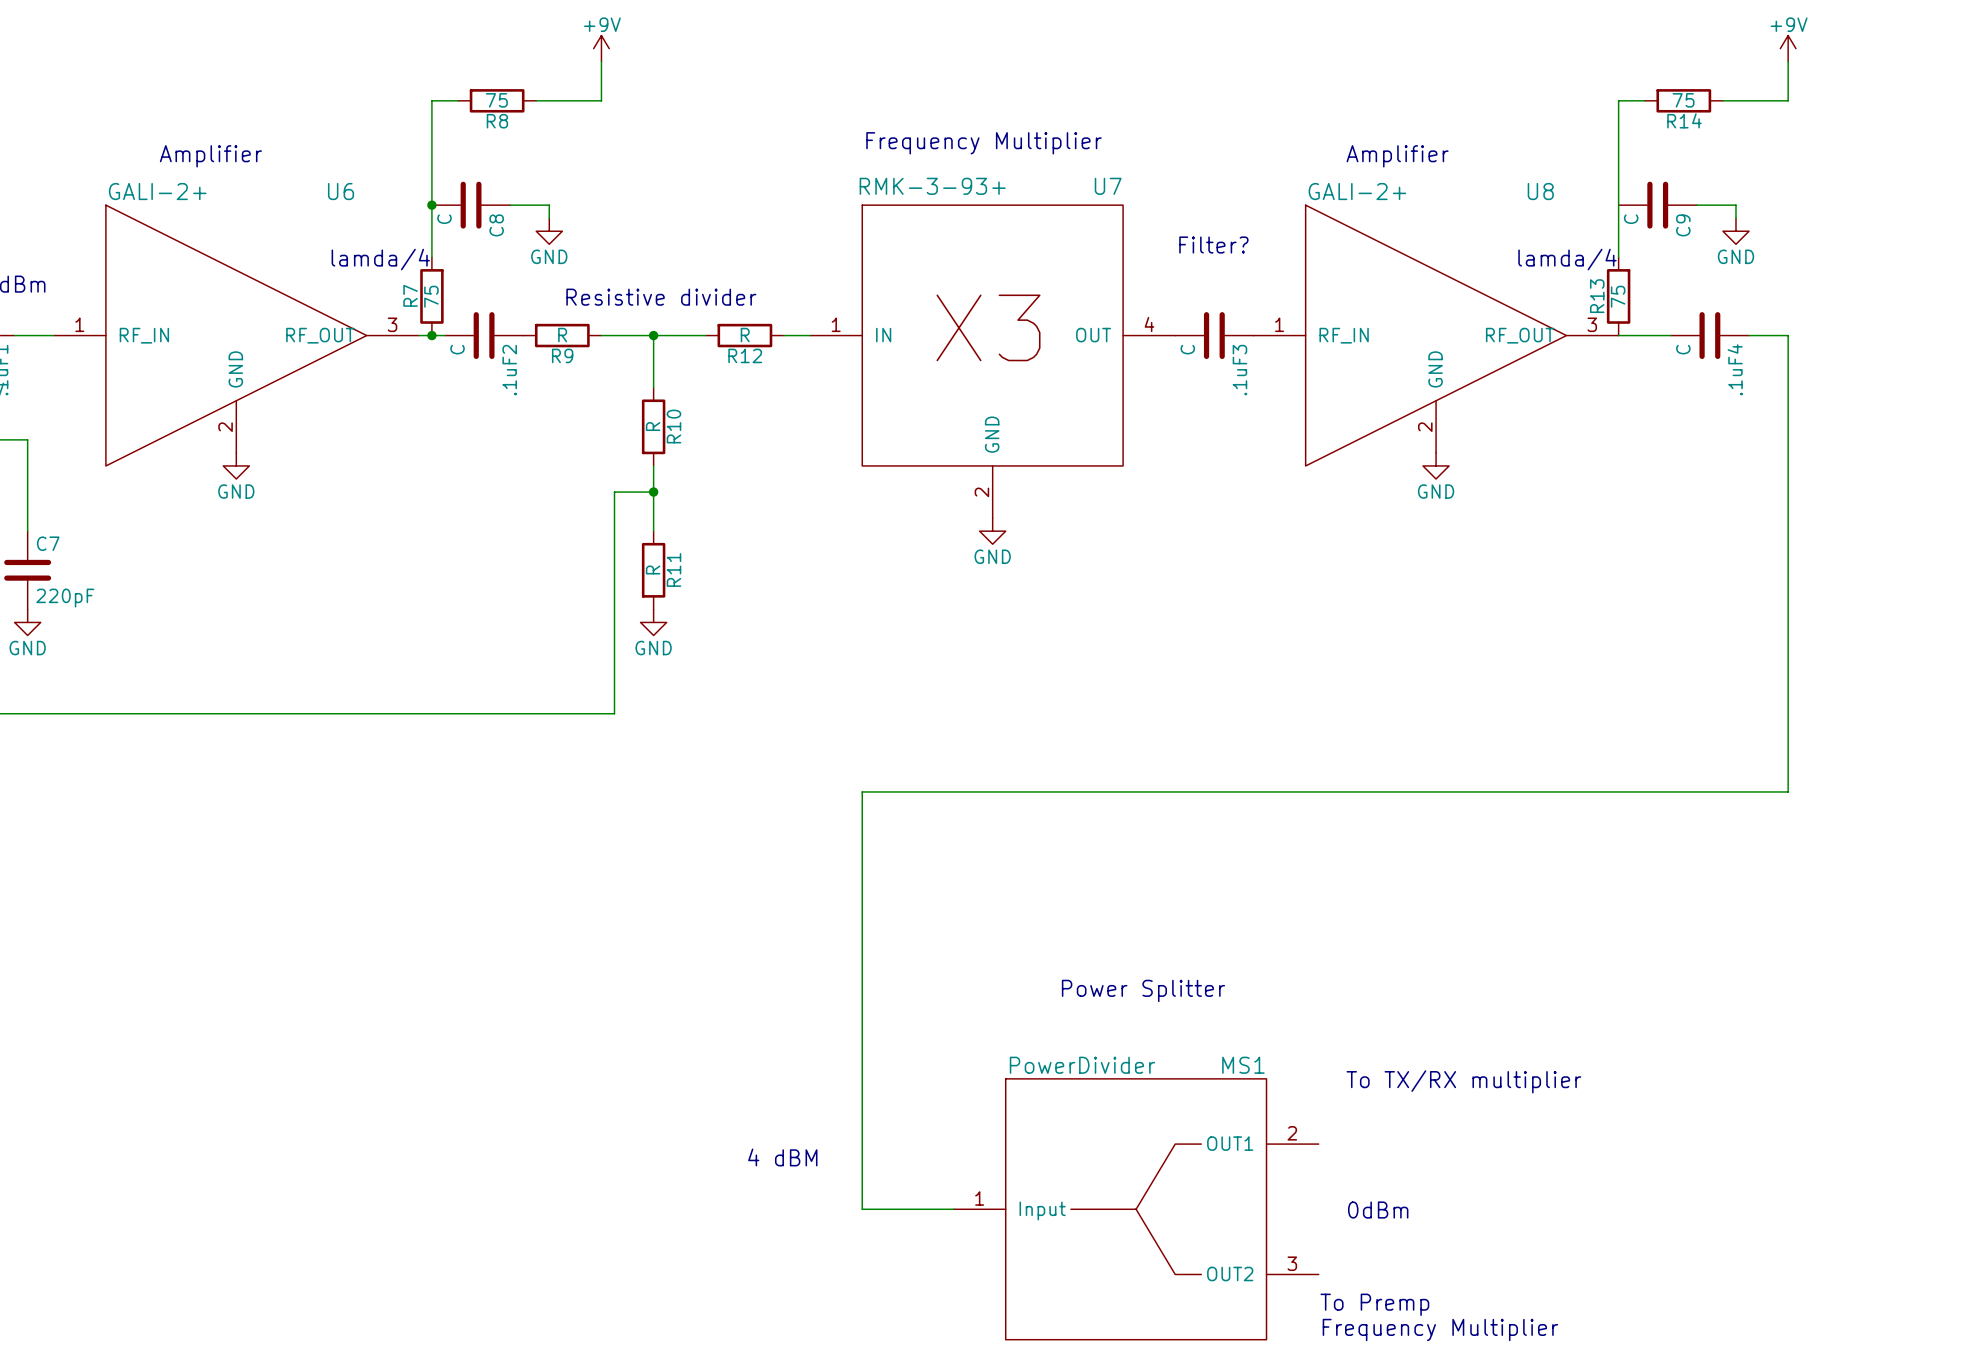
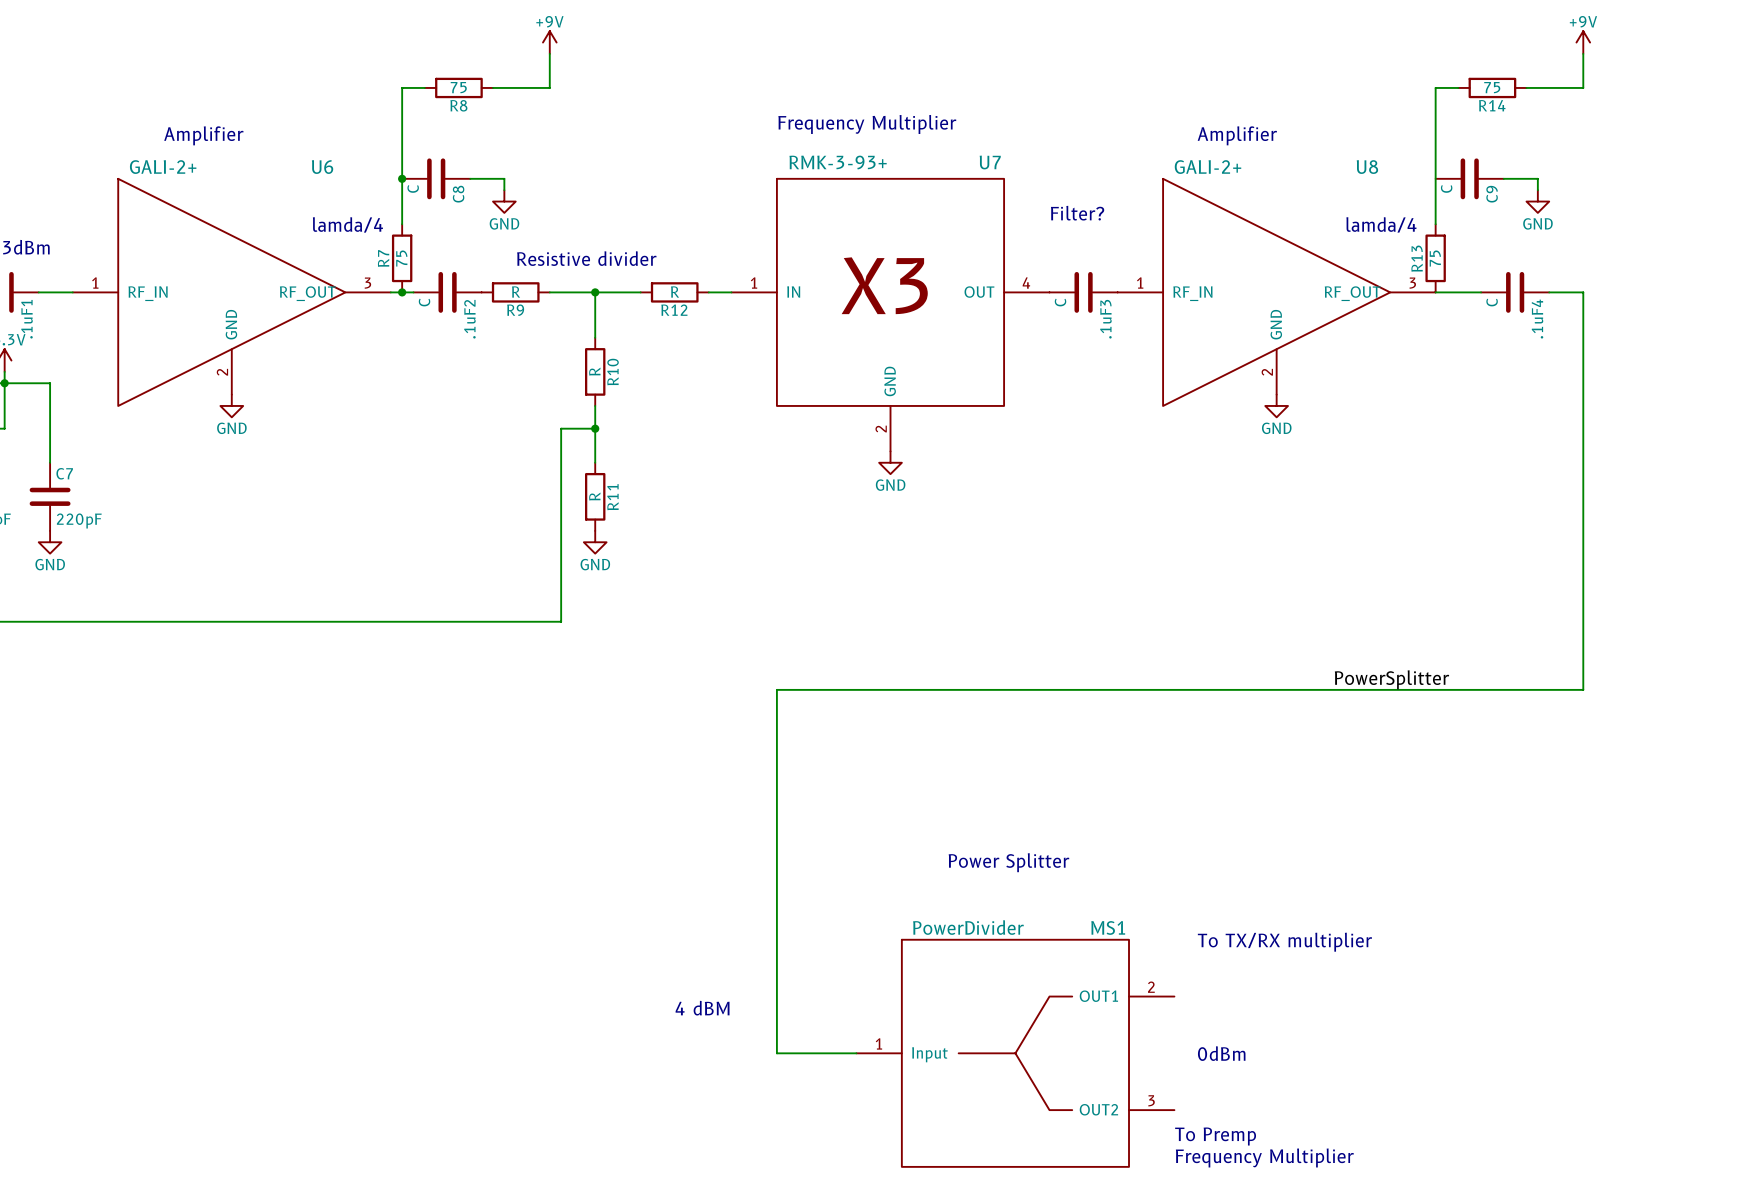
label: none -> PowerSplitter (1391, 679)

